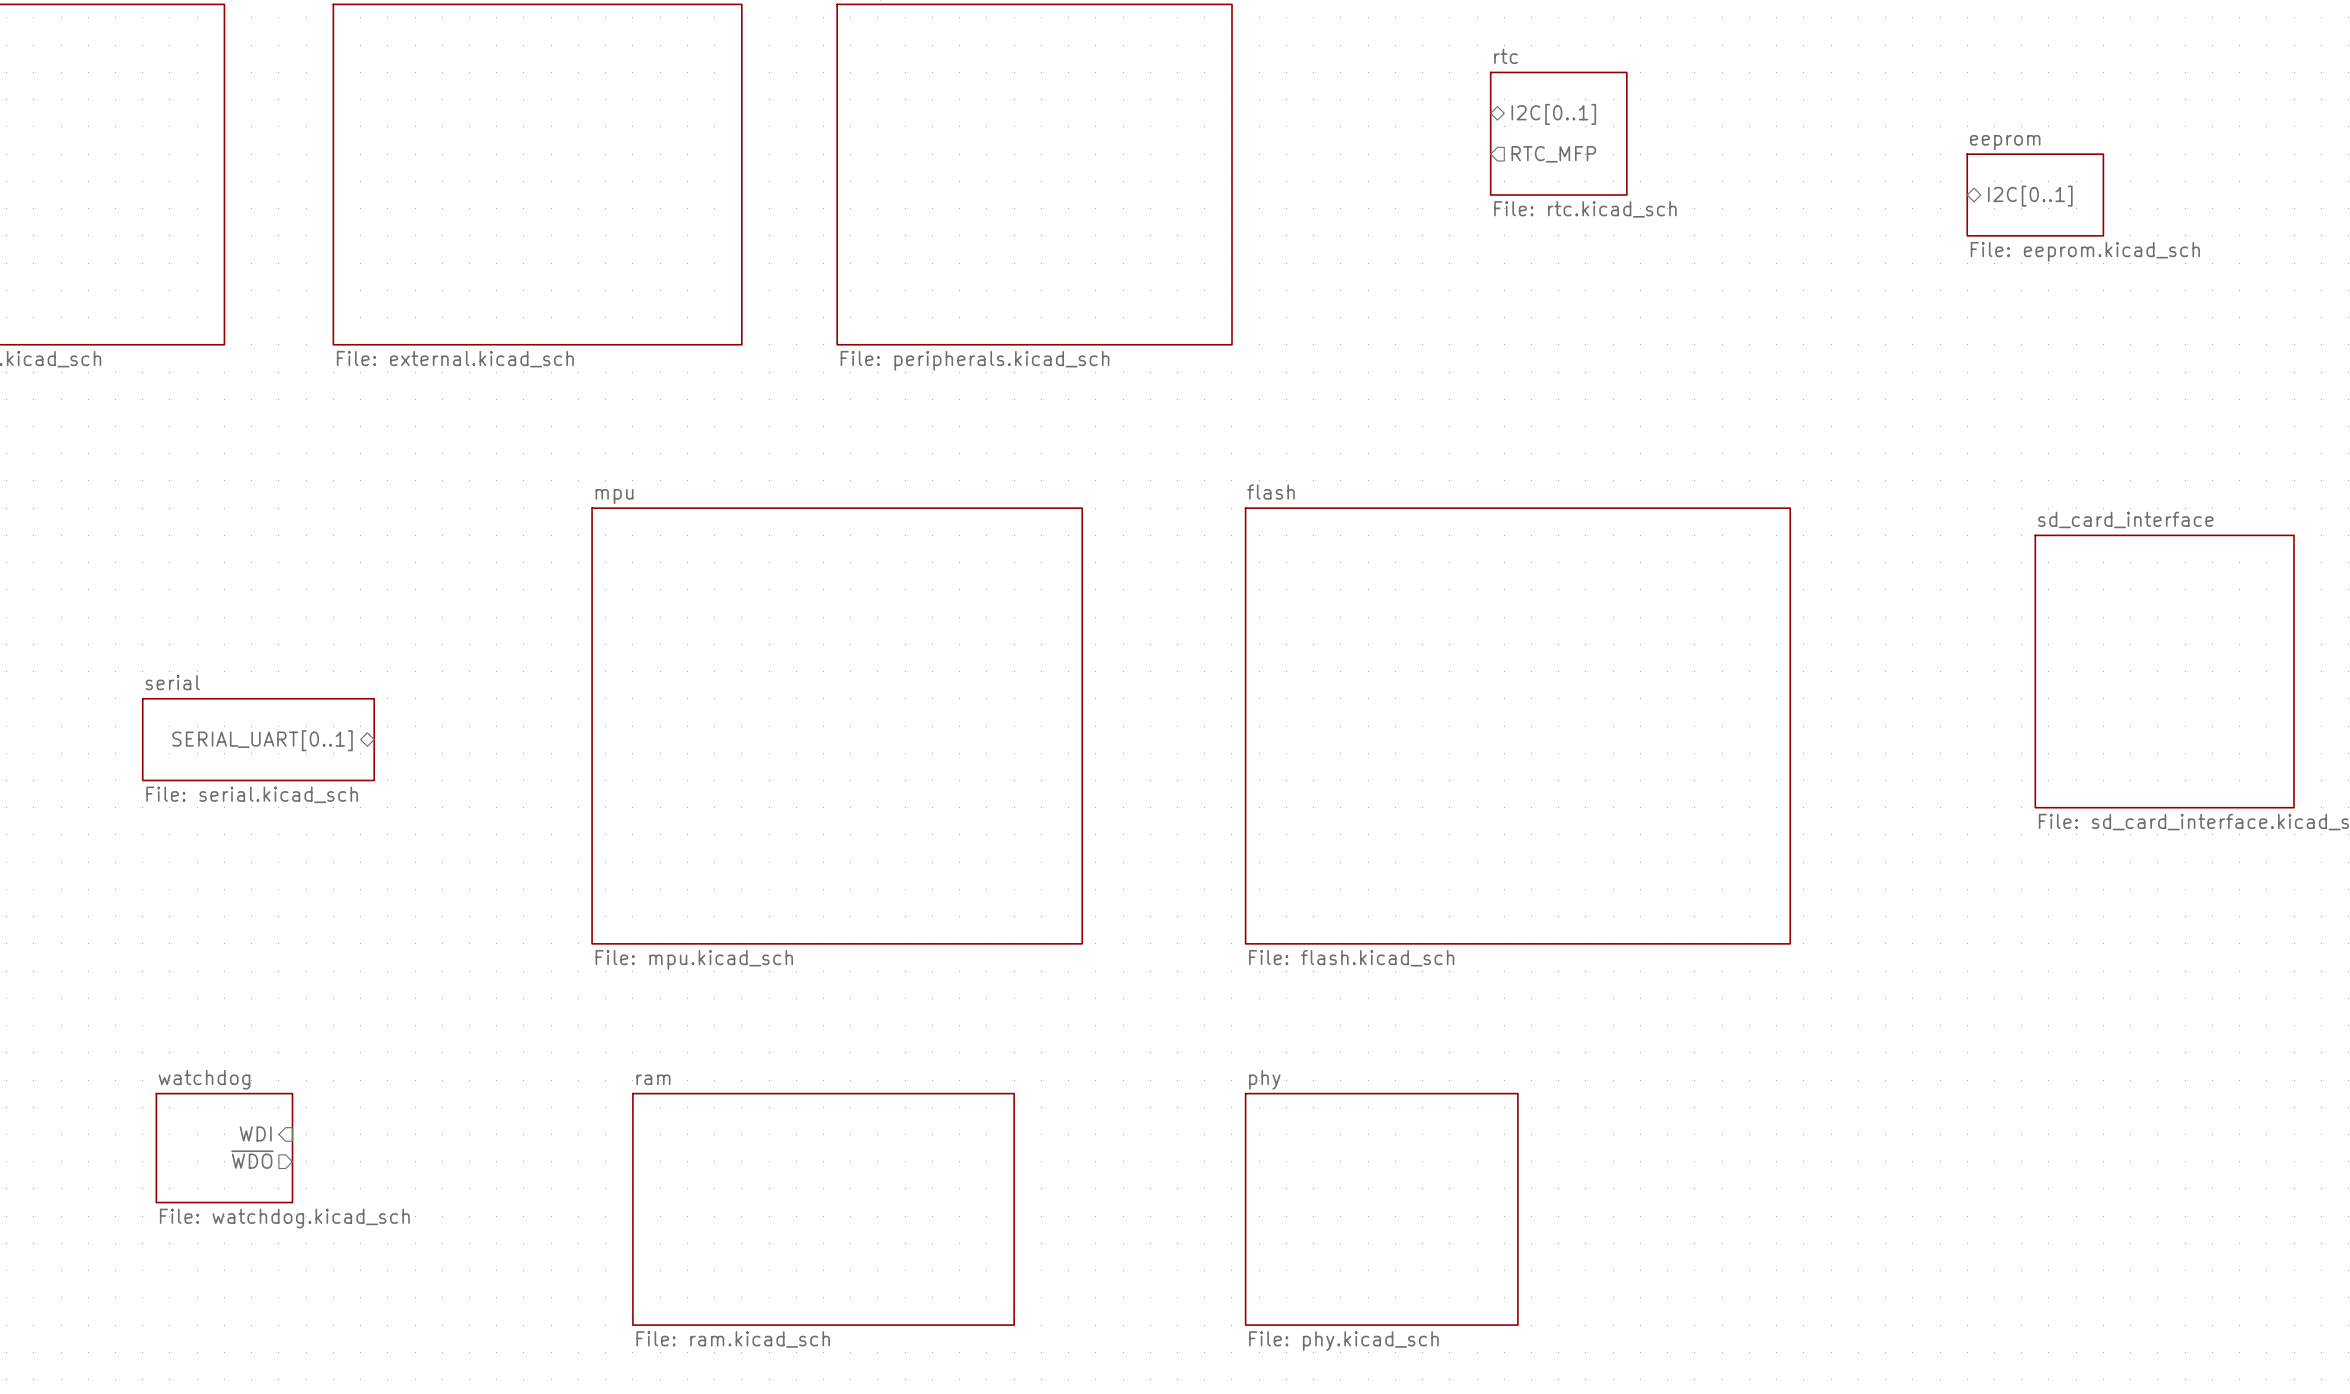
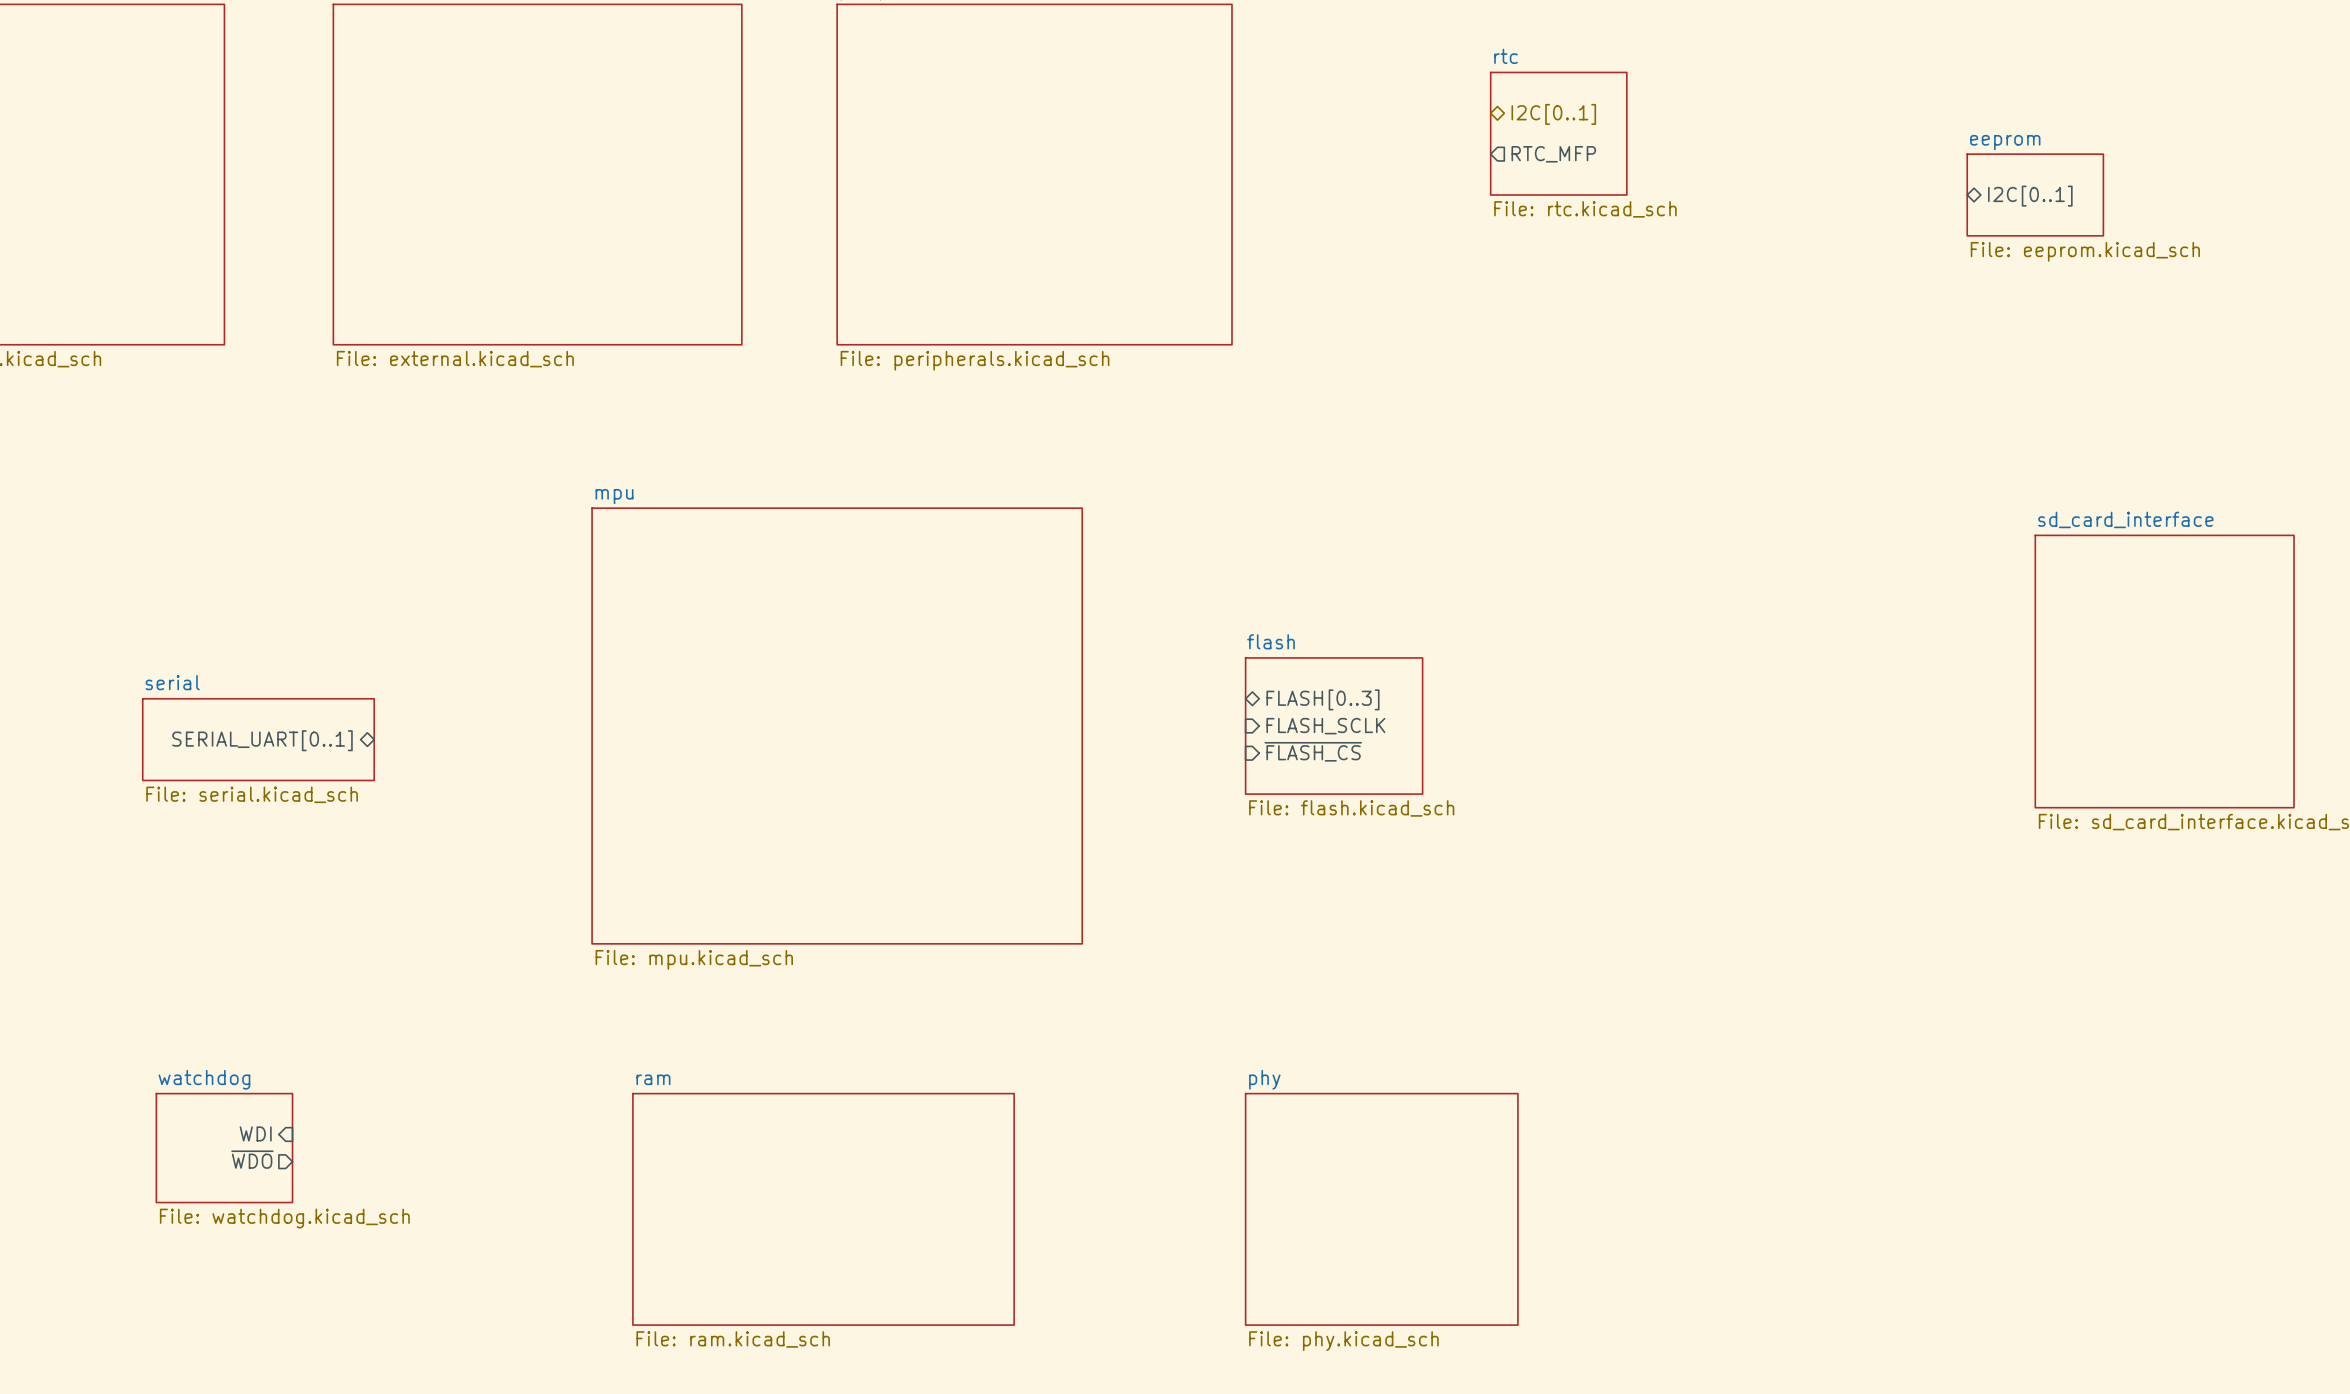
sheet pin: none -> FLASH[0..3] (1322, 699)
sheet pin: none -> FLASH_SCLK (1325, 726)
sheet flash: none -> File: flash.kicad_sch (1334, 726)
sheet flash: File: flash.kicad_sch (1517, 726) -> none
sheet pin: none -> ~{FLASH_CS} (1313, 751)

